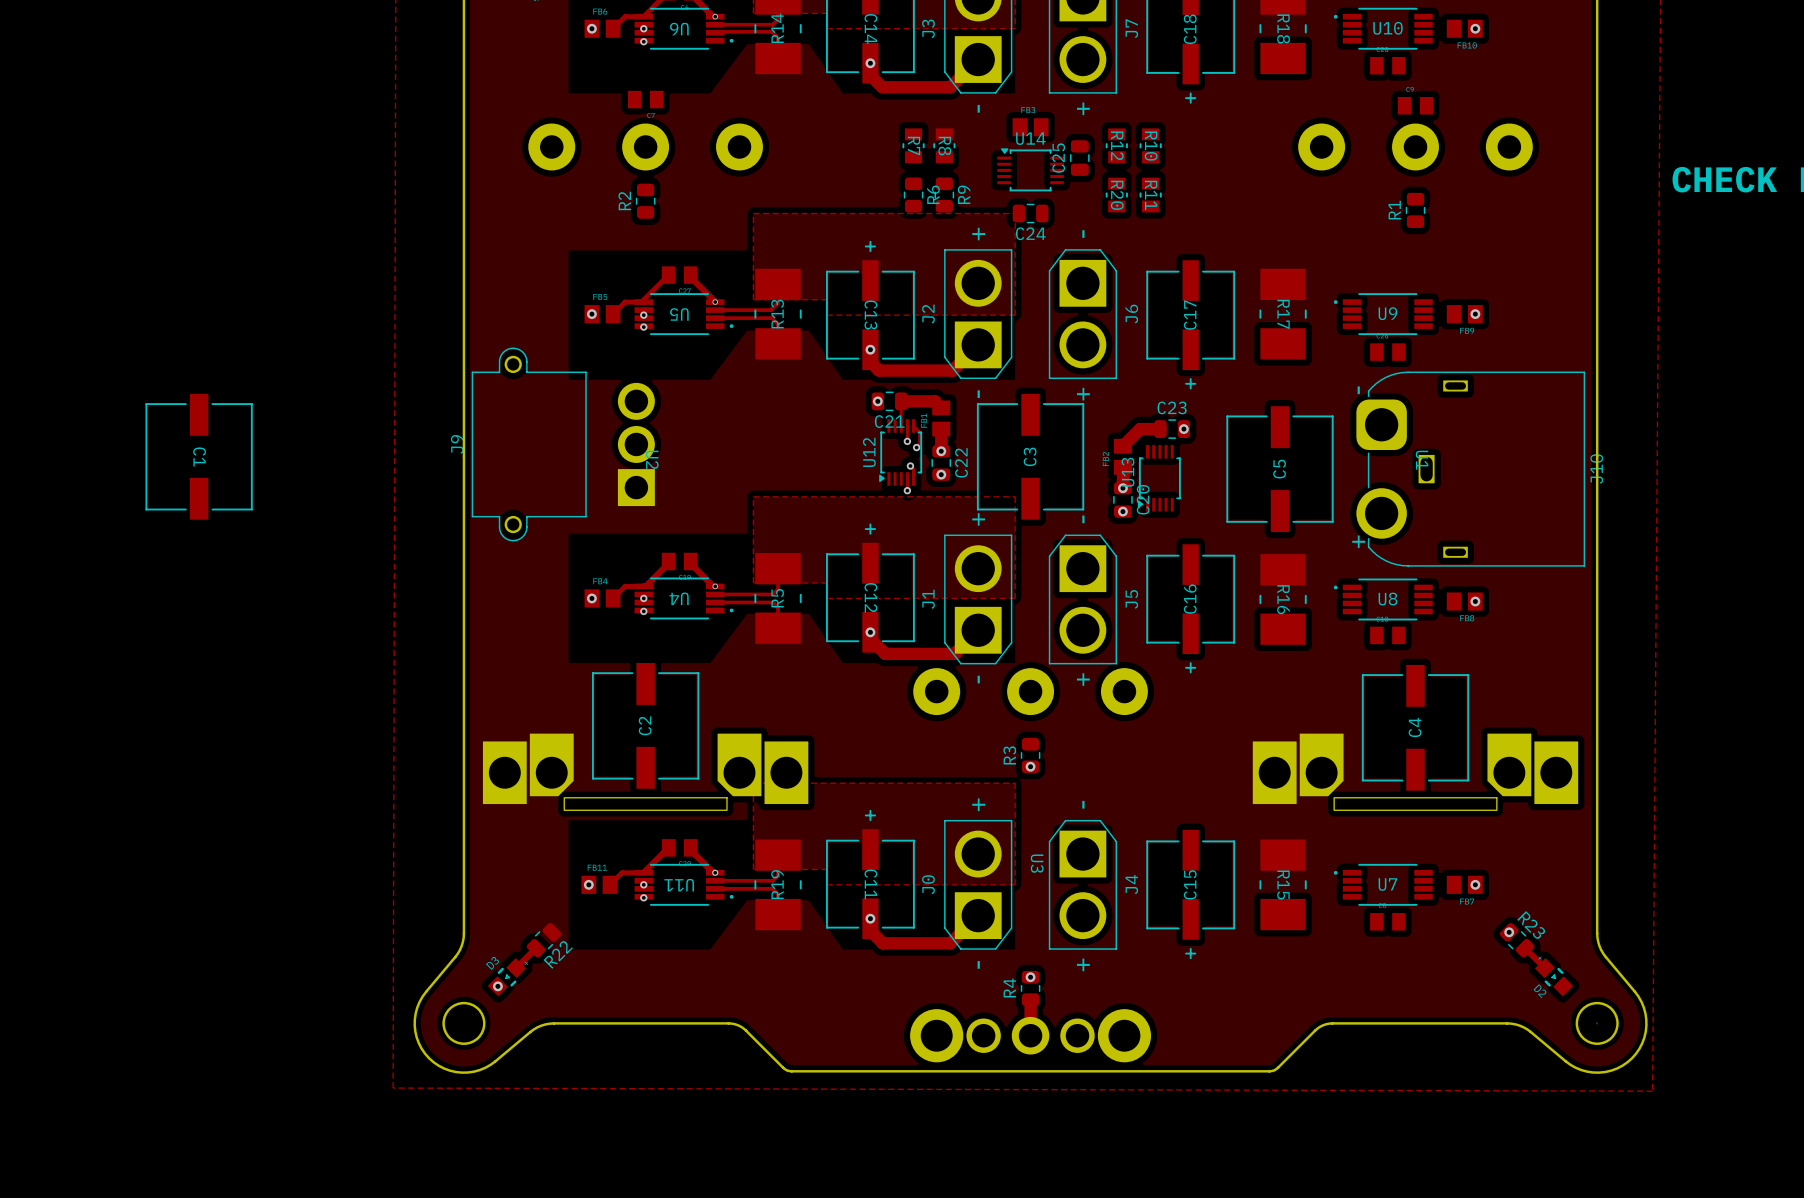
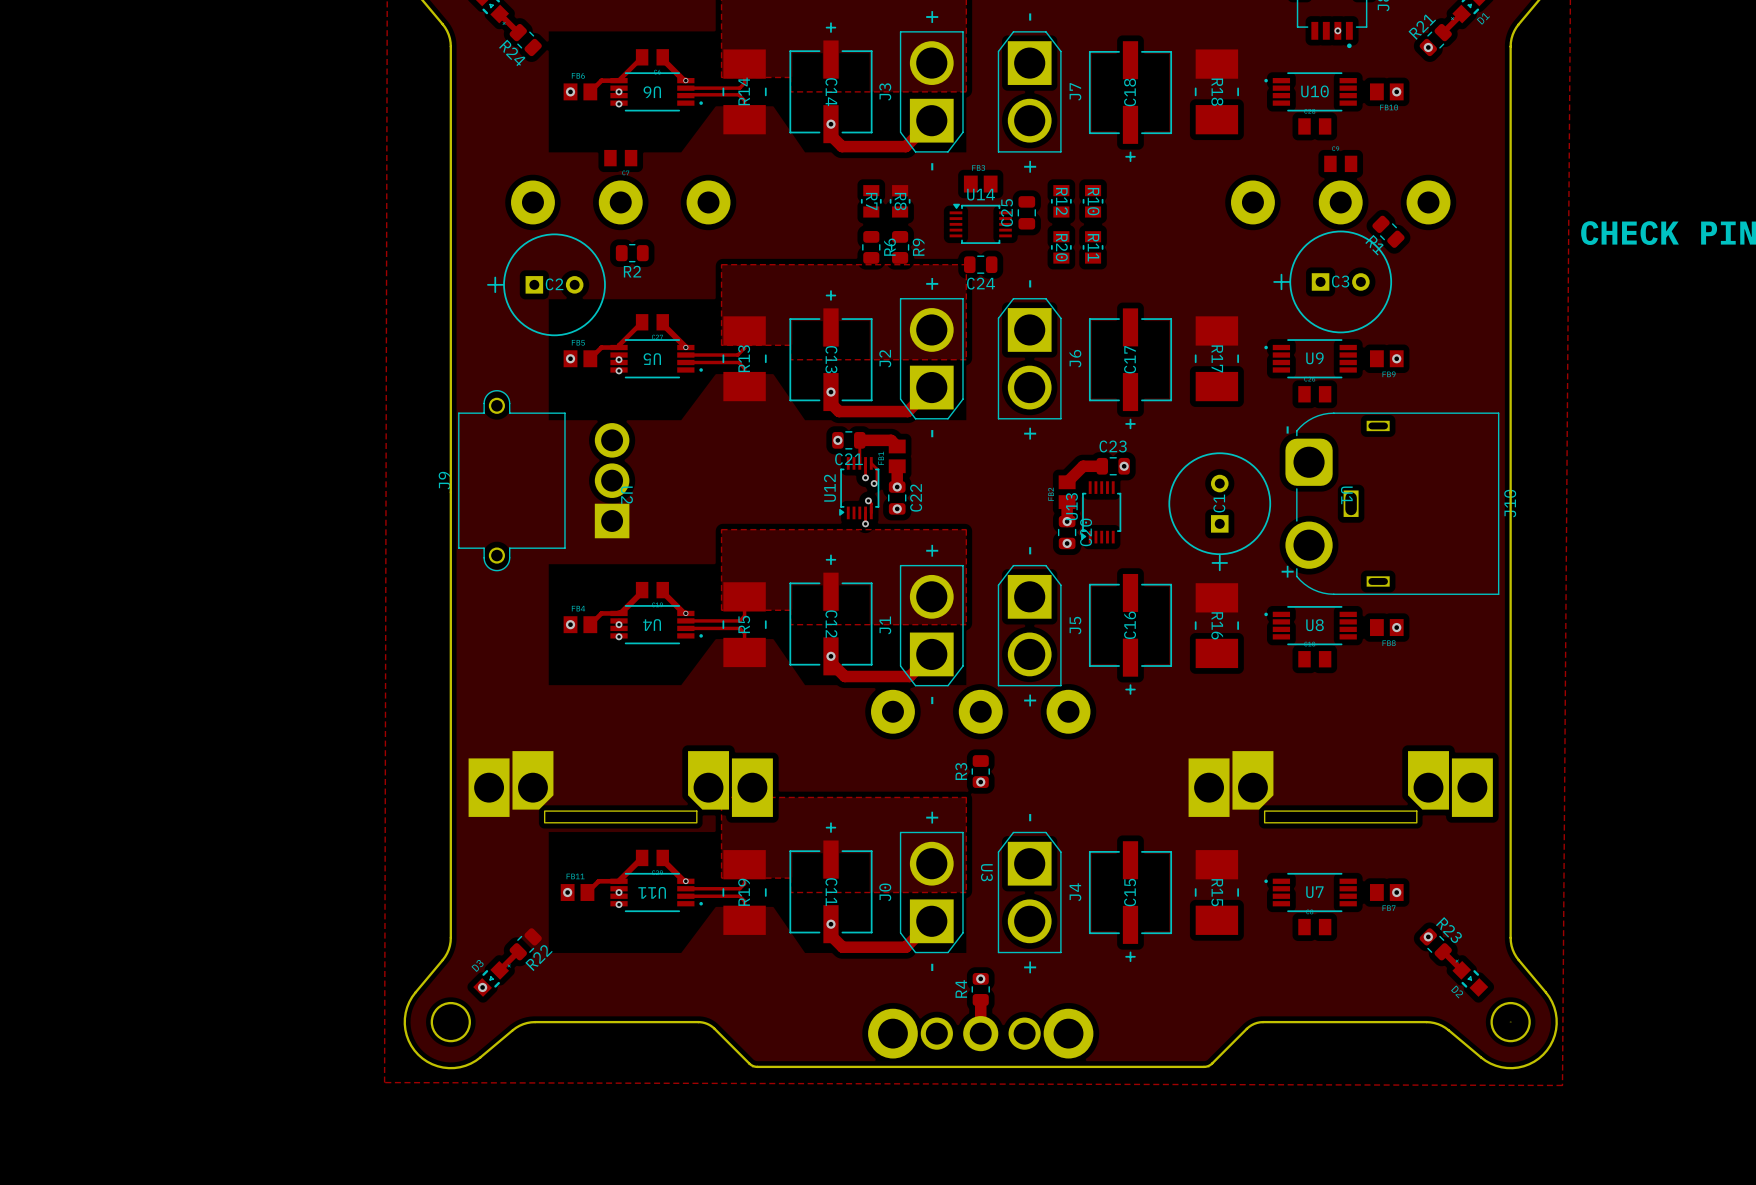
R2 name position: R2 (624, 200) -> R2 (632, 271)
R2 rotation: 0° (645, 201) -> 90° clockwise (632, 253)
R1 rotation: 0° (1415, 210) -> 45° counterclockwise (1388, 231)
R1 position: (1415, 210) -> (1388, 231)
C1 footprint: [145, 393, 253, 520] -> [1168, 452, 1272, 572]
C3 footprint: [976, 393, 1085, 520] -> [1273, 230, 1393, 334]
C5: (1280, 469) -> none
C2 footprint: [591, 663, 700, 789] -> [487, 233, 606, 337]
C4: (1415, 727) -> none

